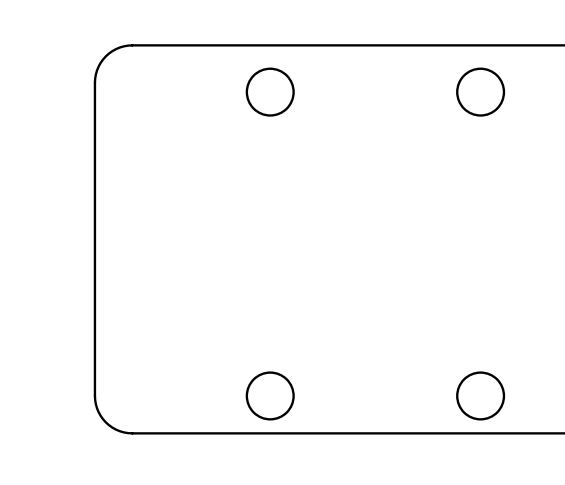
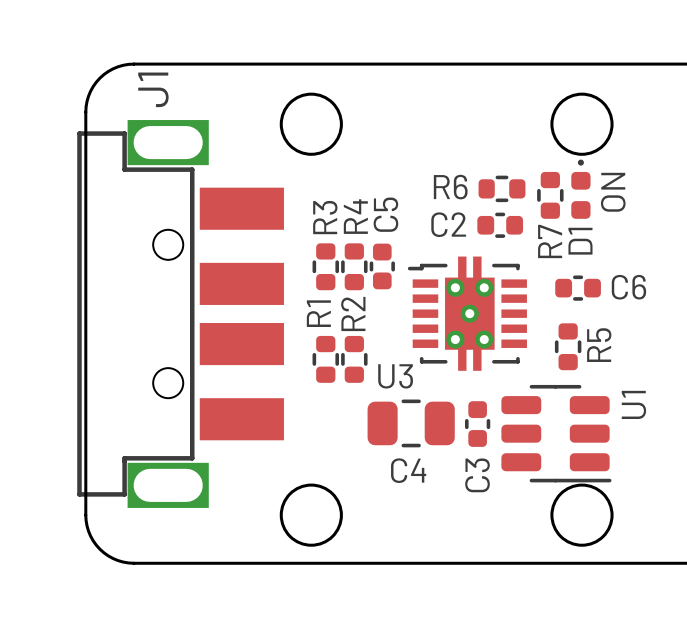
R6: none -> (501, 188)
D1: none -> ON (580, 189)
R7: none -> (550, 195)
C2: none -> (500, 225)
R3: none -> (325, 266)
R4: none -> (354, 266)
C5: none -> (382, 266)
C6: none -> (578, 288)
J1: none -> (180, 313)
U3: none -> (467, 313)
R5: none -> (568, 346)
R1: none -> (325, 359)
R2: none -> (354, 359)
C4: none -> (411, 423)
C3: none -> (477, 424)
U1: none -> (556, 433)

